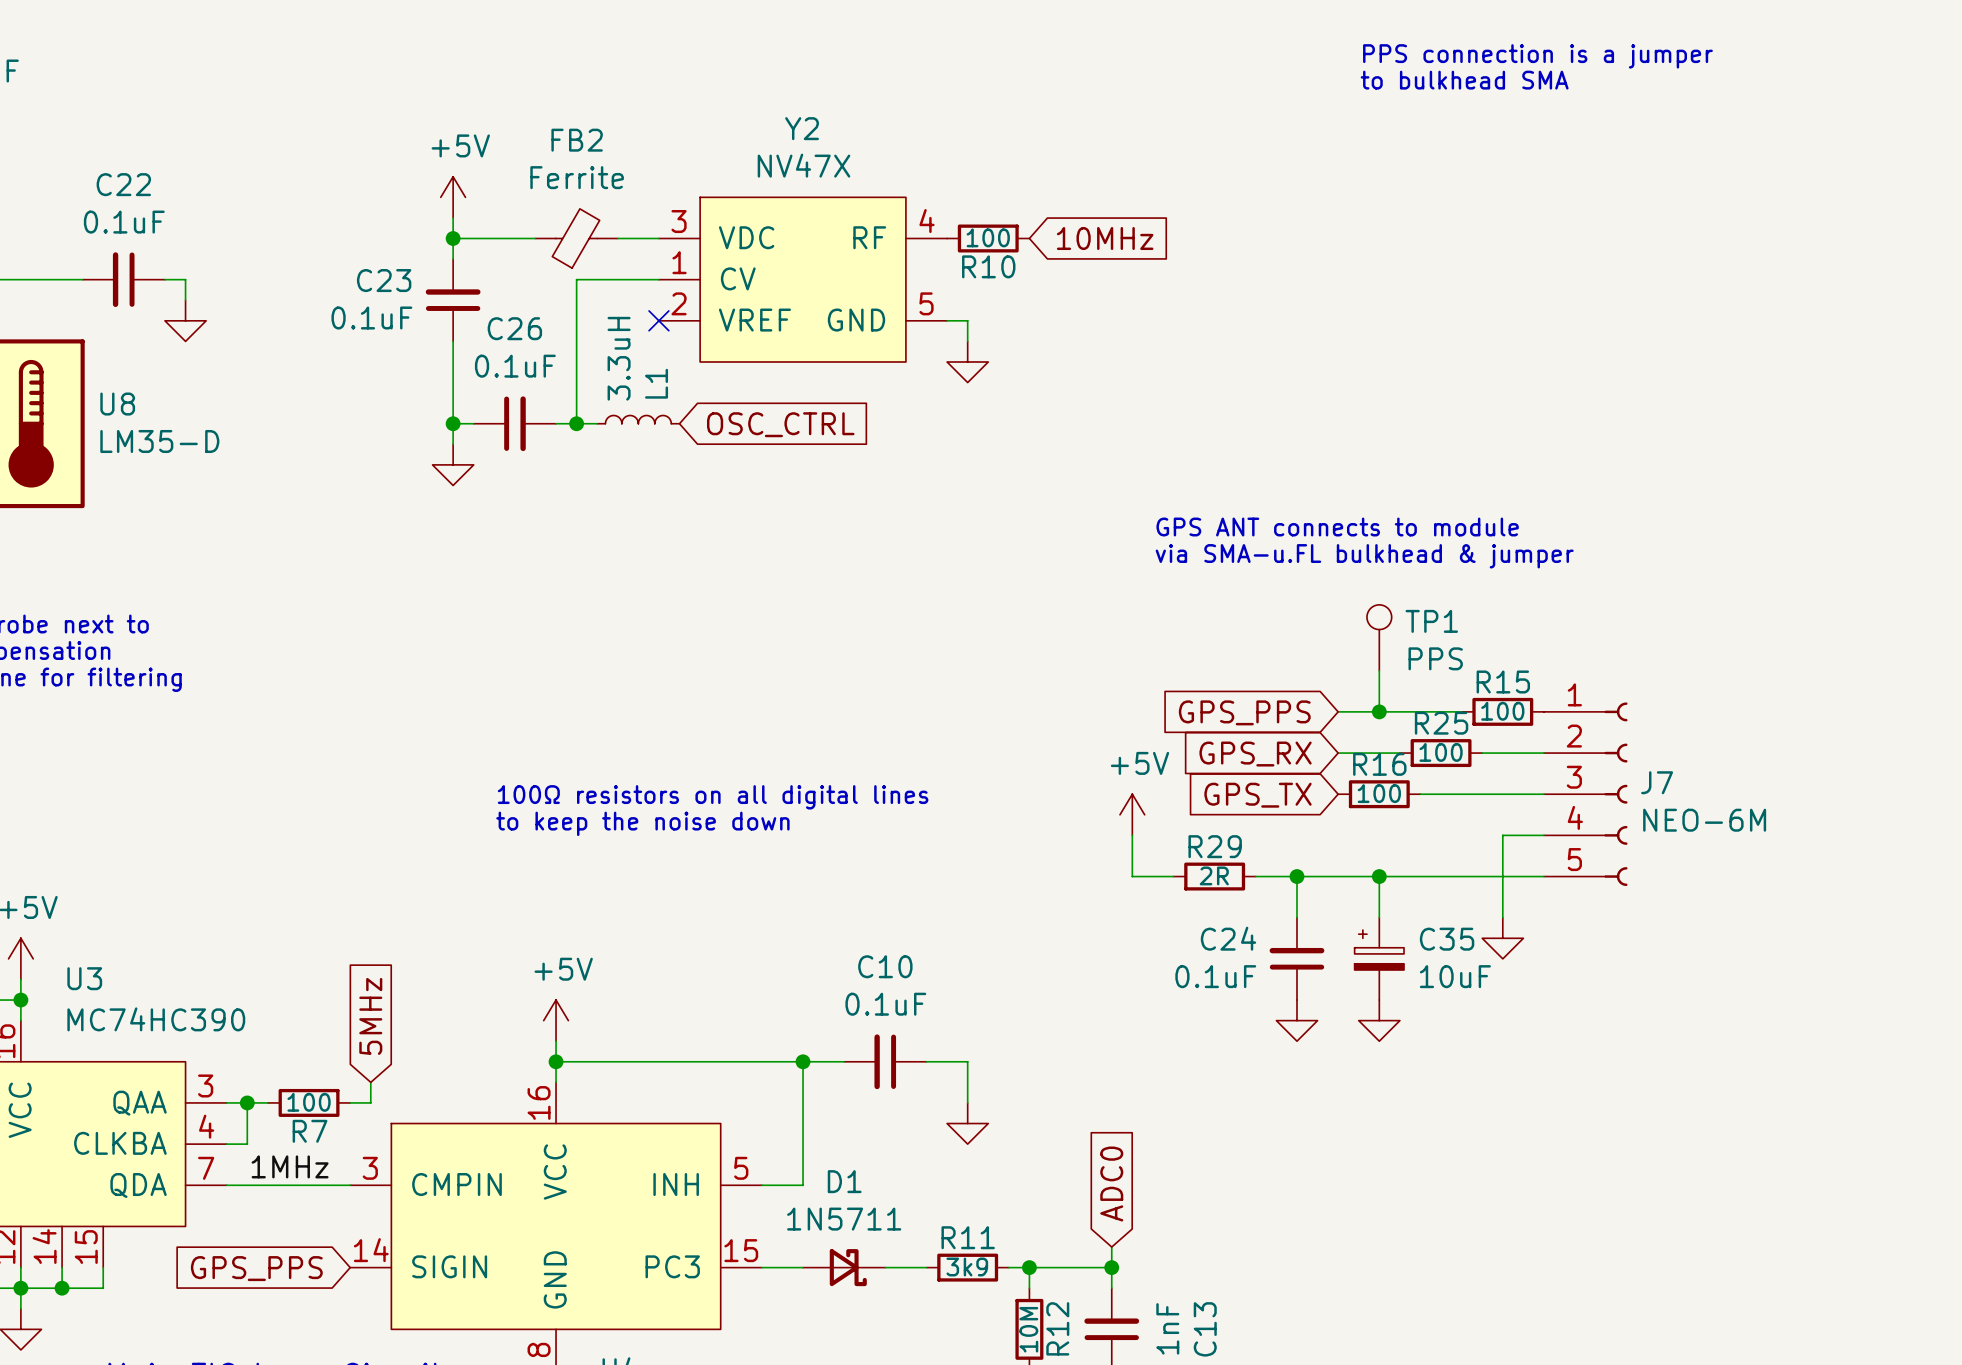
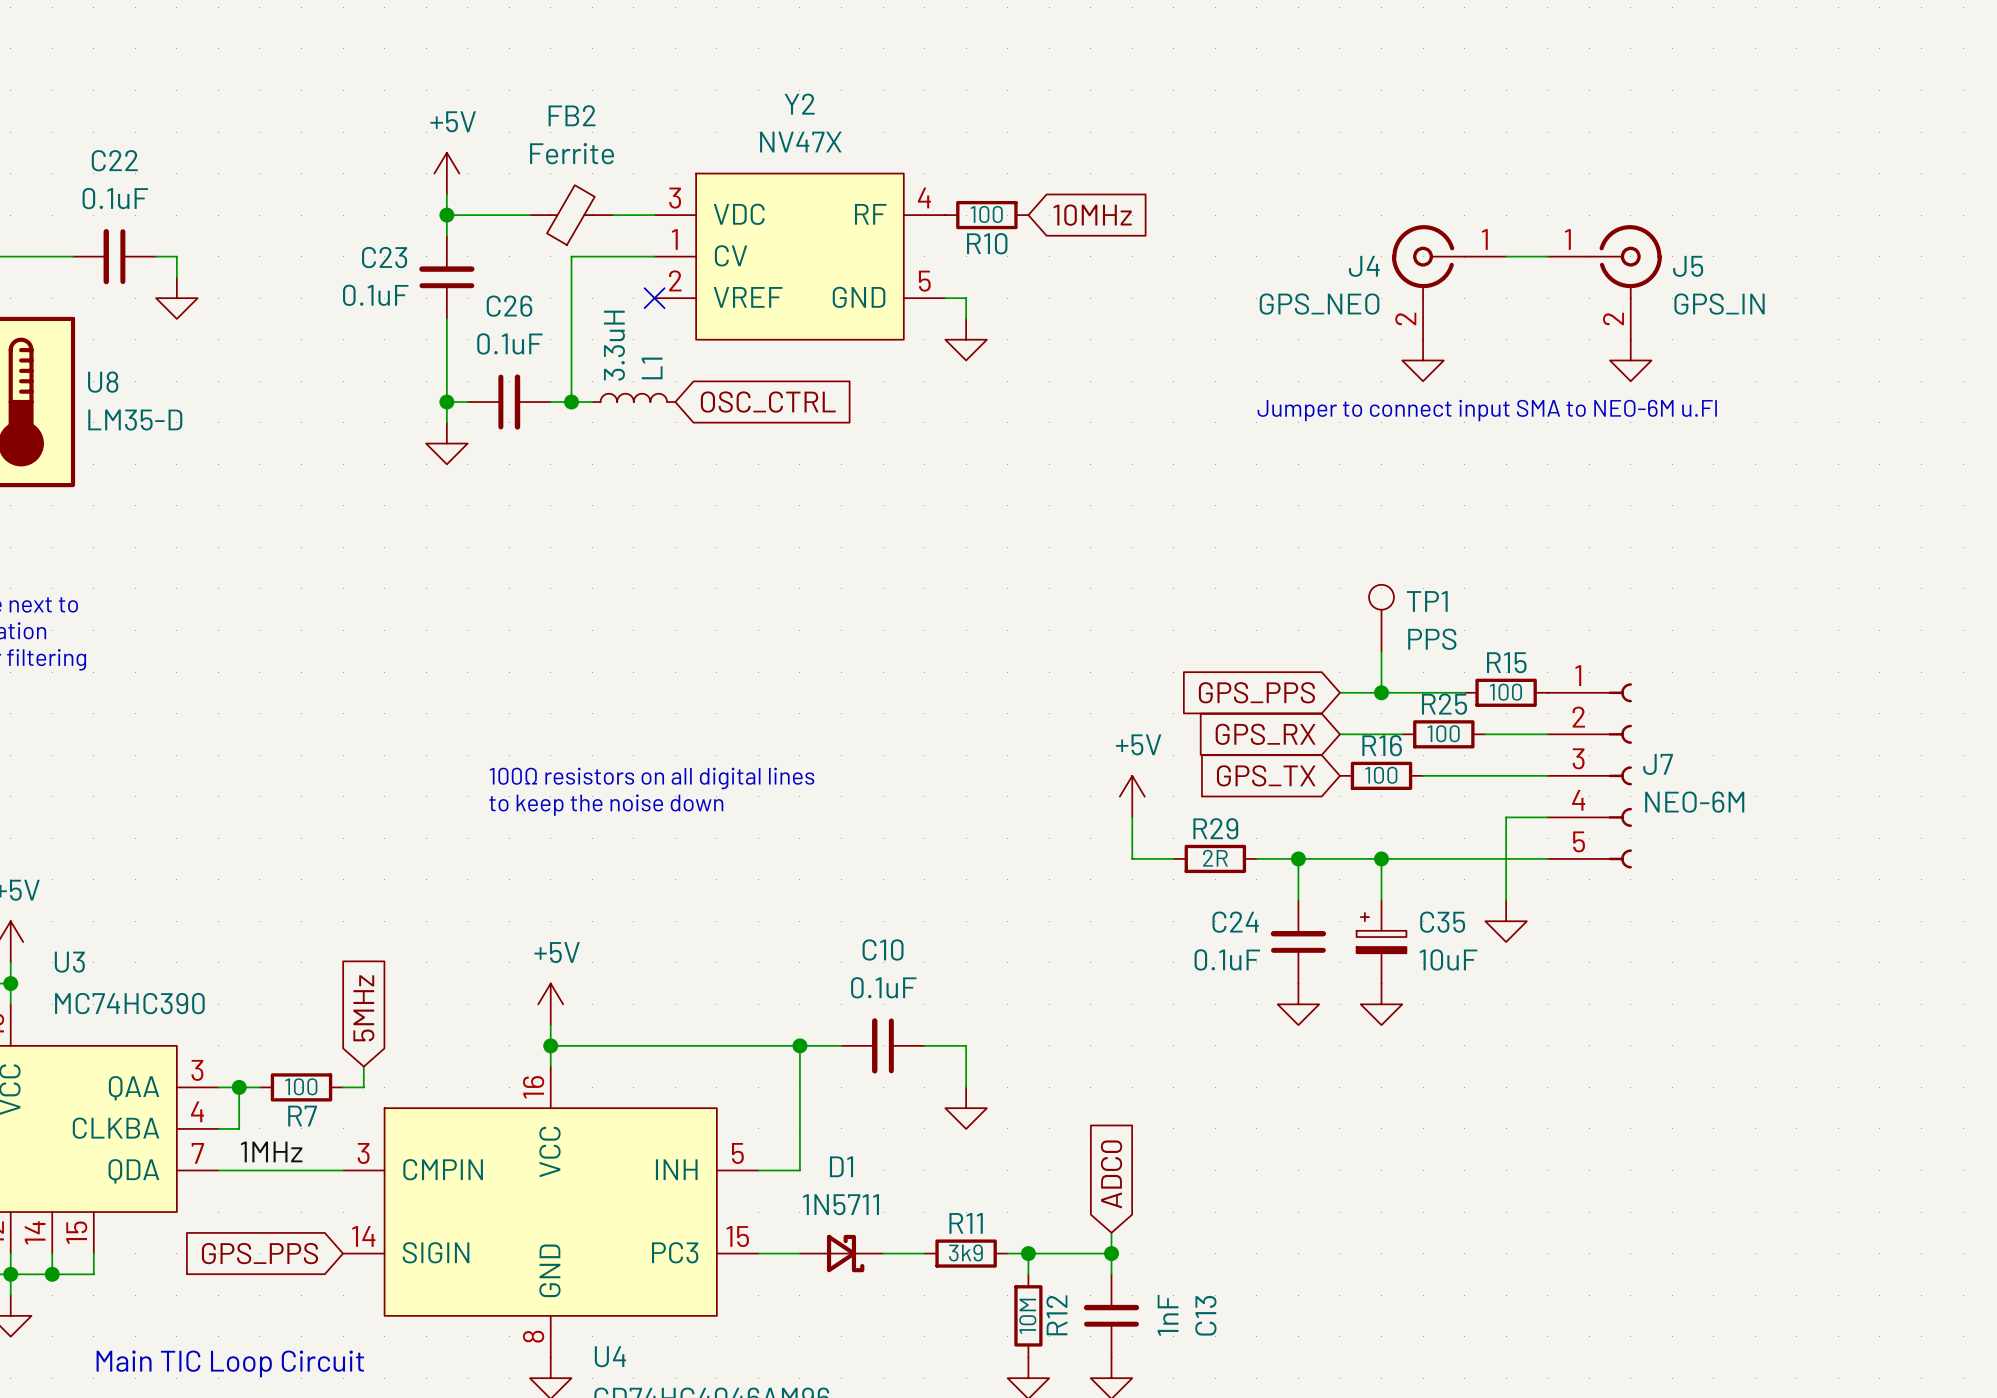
text: PPS connection is a jumper (1537, 56) -> none
text: to bulkhead SMA (1464, 80) -> none
wire: none -> (1506, 256) (1547, 256)
J4: none -> GPS_NEO (1449, 282)
J5: none -> GPS_IN (1604, 282)
power symbol: none -> (1423, 360)
power symbol: none -> (1630, 360)
text: none -> Jumper to connect input SMA to NEO-6M u.Fl (1487, 410)
text: GPS ANT connects to module (1337, 527) -> none
text: via SMA-u.FL bulkhead & jumper (1364, 556) -> none

